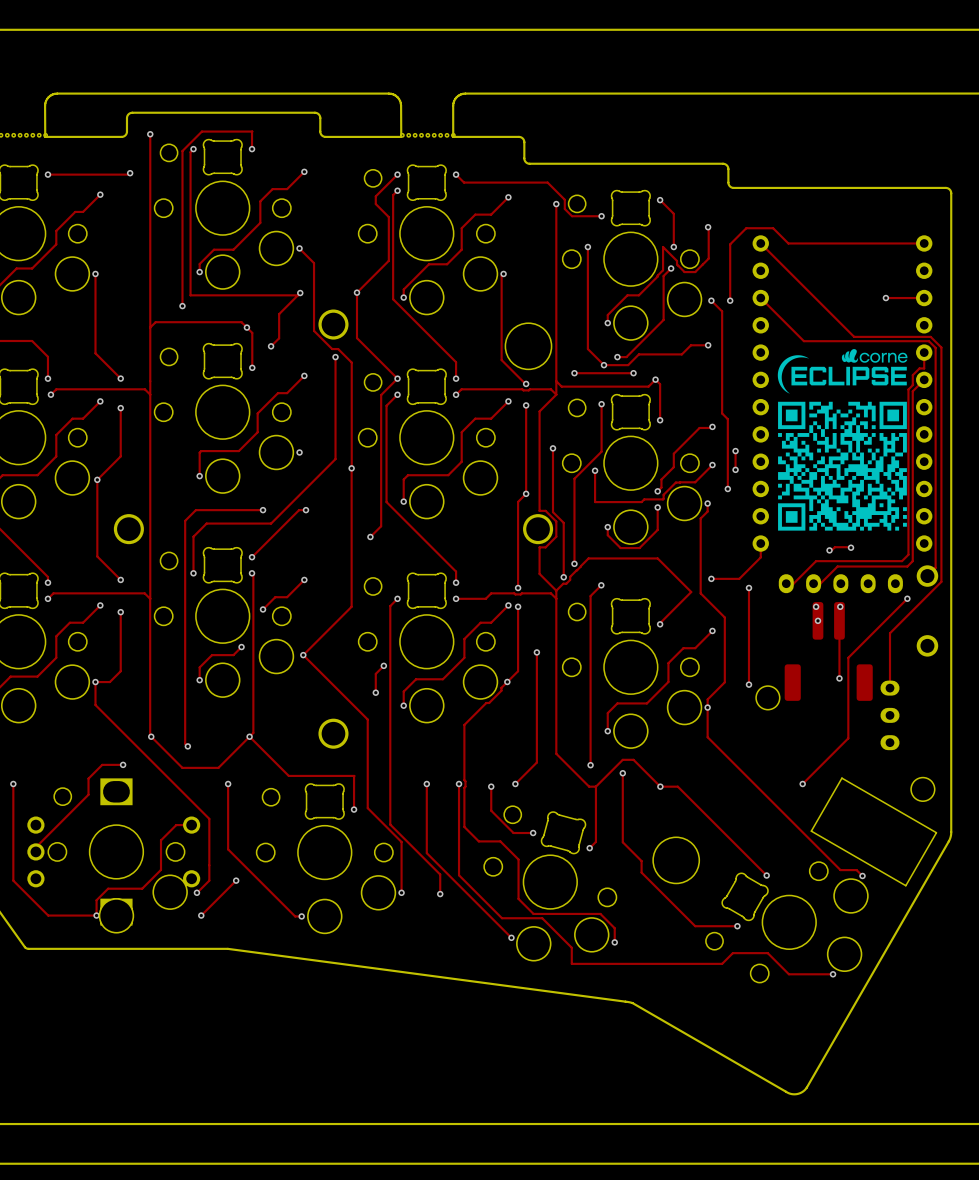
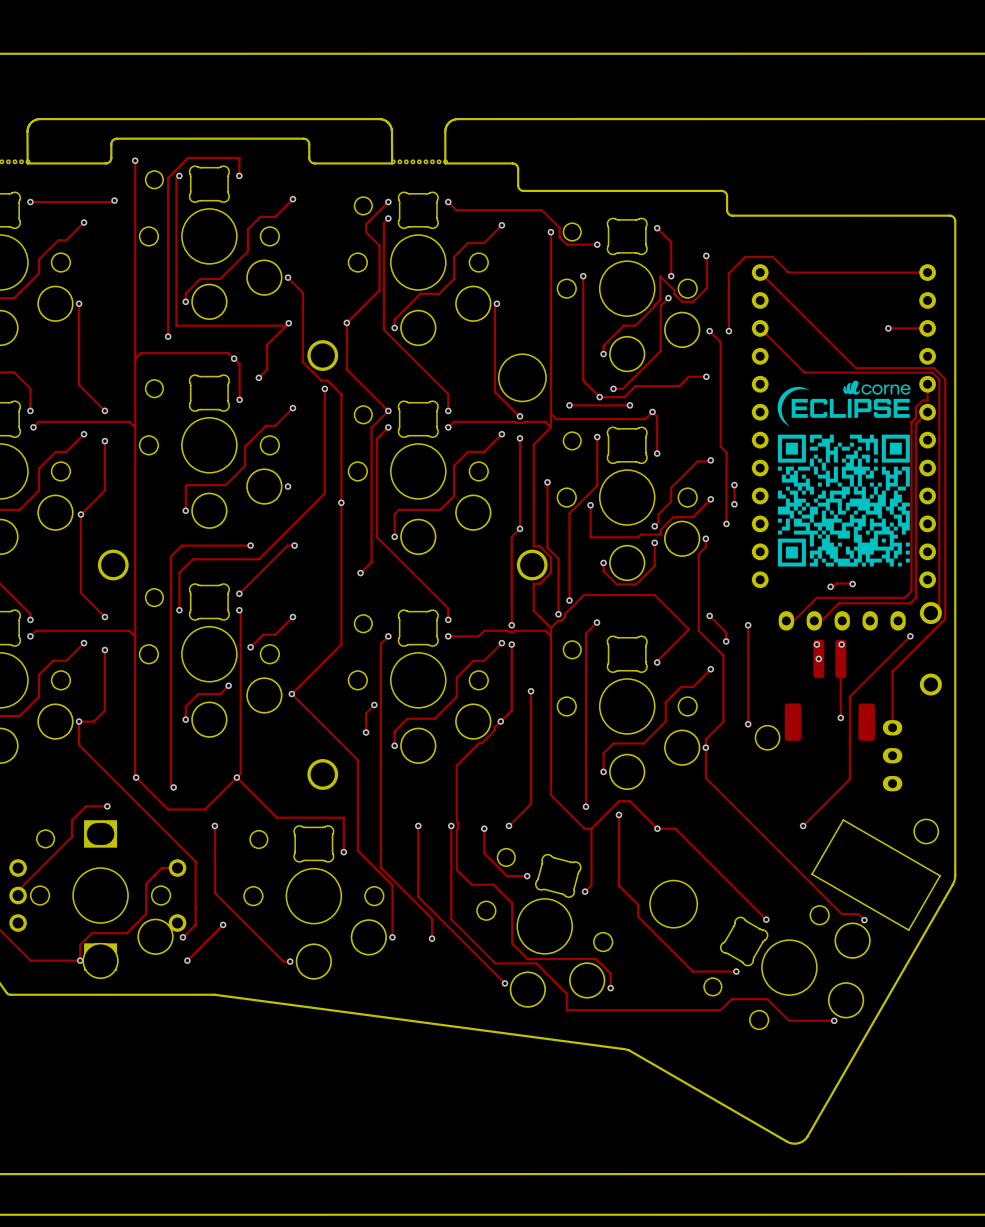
track: (760, 543) (760, 557) (739, 578) (711, 578) -> none
track: none -> (710, 616) (726, 632) (726, 641)
via: none -> (726, 641)

